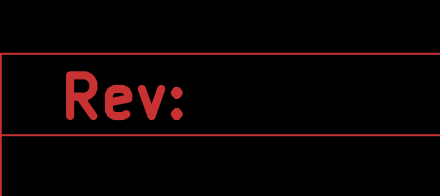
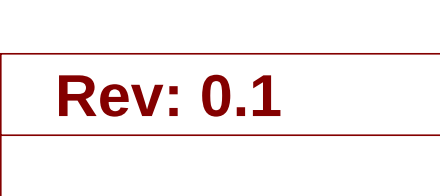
title block: Rev: (124, 95) -> Rev: 0.1 (169, 95)

